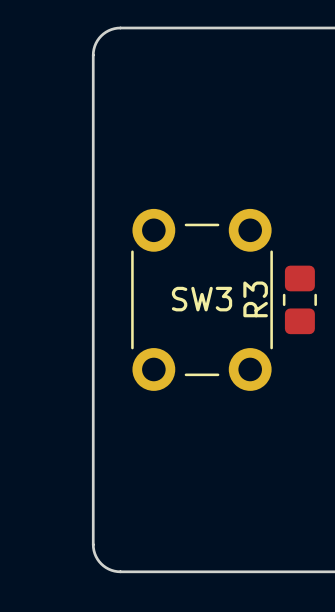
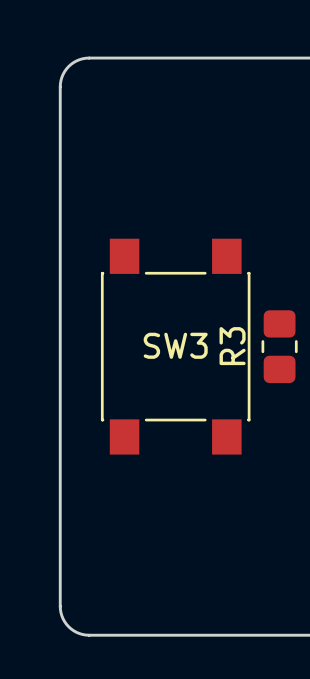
SW3 footprint: [131, 208, 273, 391] -> [100, 238, 251, 455]

